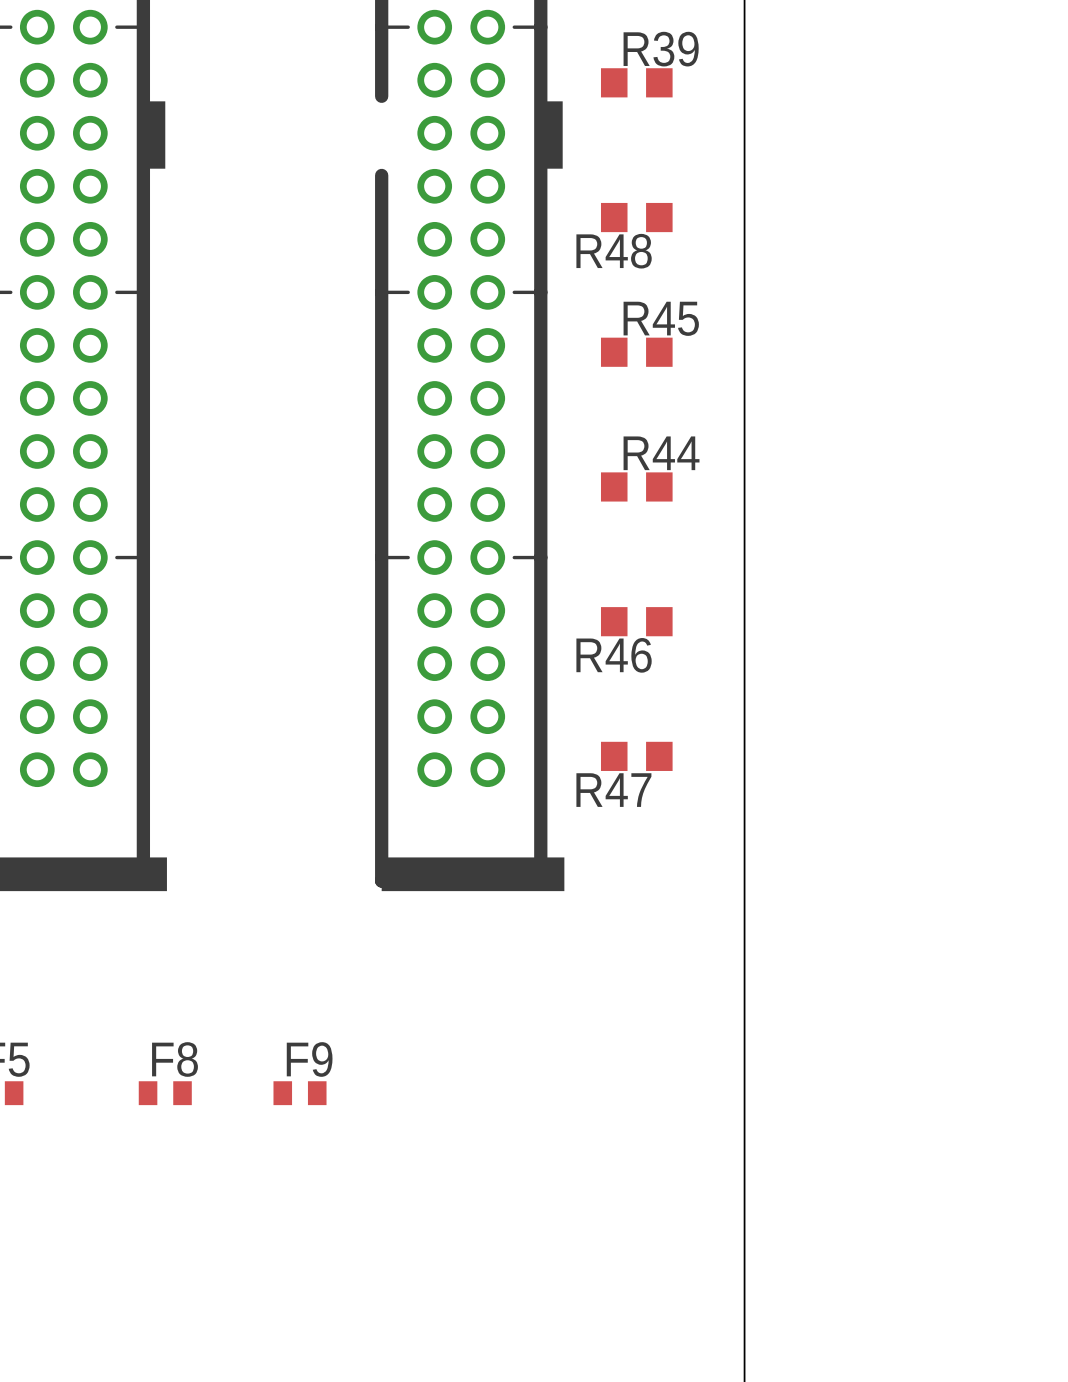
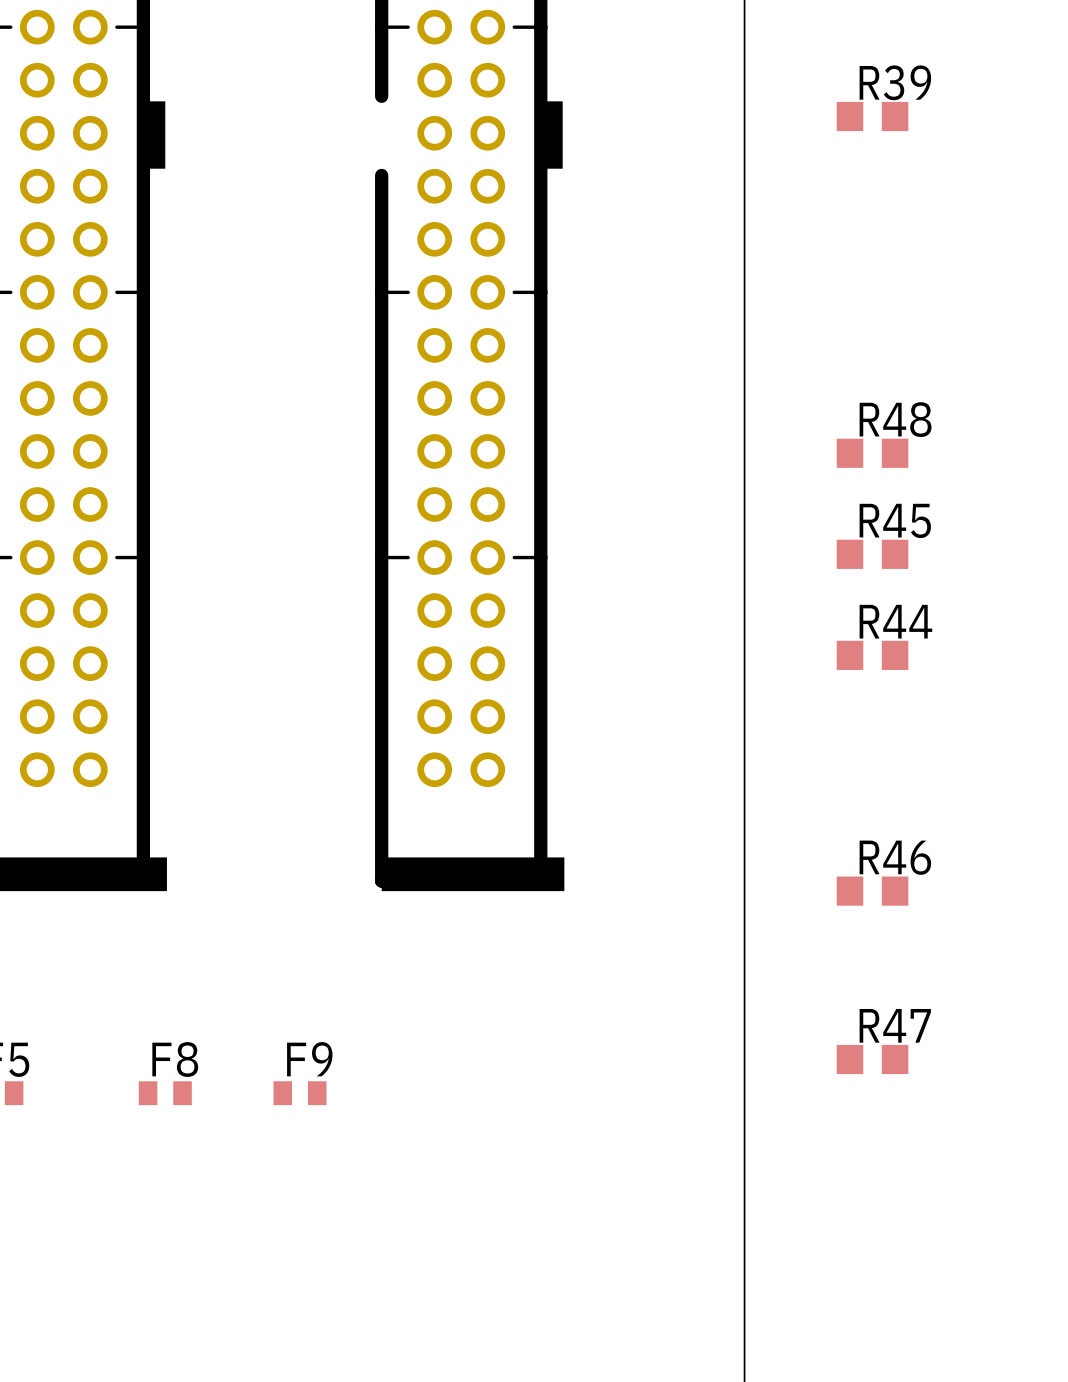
R39 position: (636, 82) -> (872, 116)
R48 position: (636, 217) -> (872, 453)
R48 name position: R48 (614, 251) -> R48 (895, 419)
R45 position: (636, 352) -> (872, 554)
R44 position: (636, 486) -> (872, 655)
R46 position: (636, 621) -> (872, 891)
R46 name position: R46 (614, 655) -> R46 (895, 857)
R47 position: (636, 756) -> (872, 1059)
R47 name position: R47 (613, 790) -> R47 (895, 1025)

